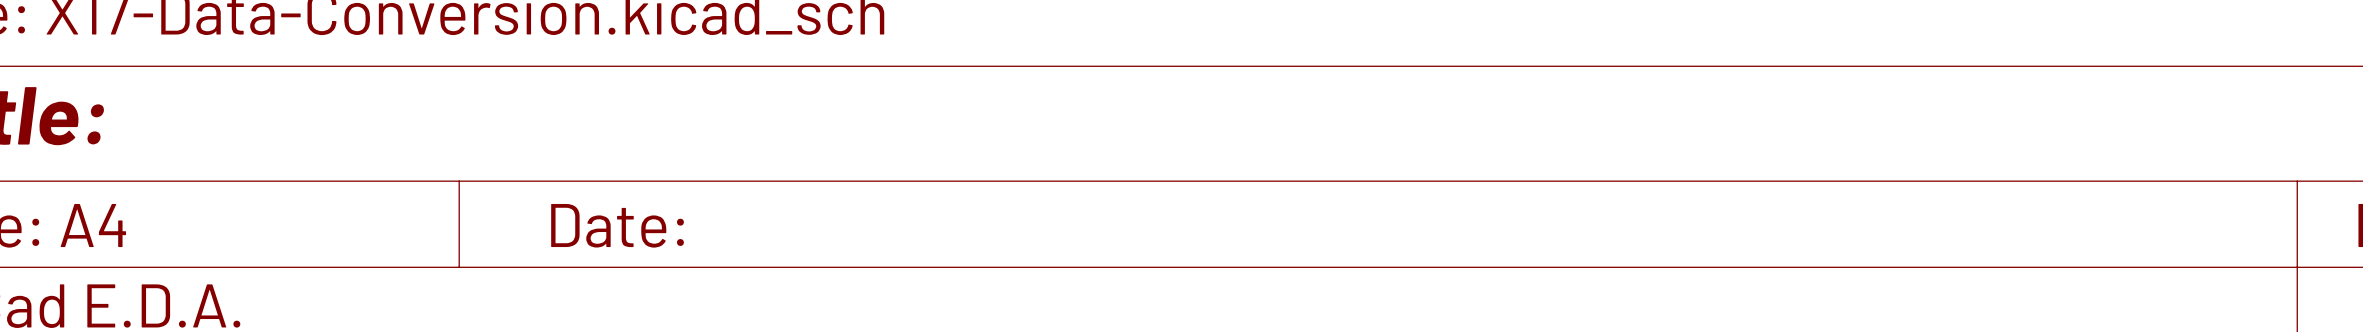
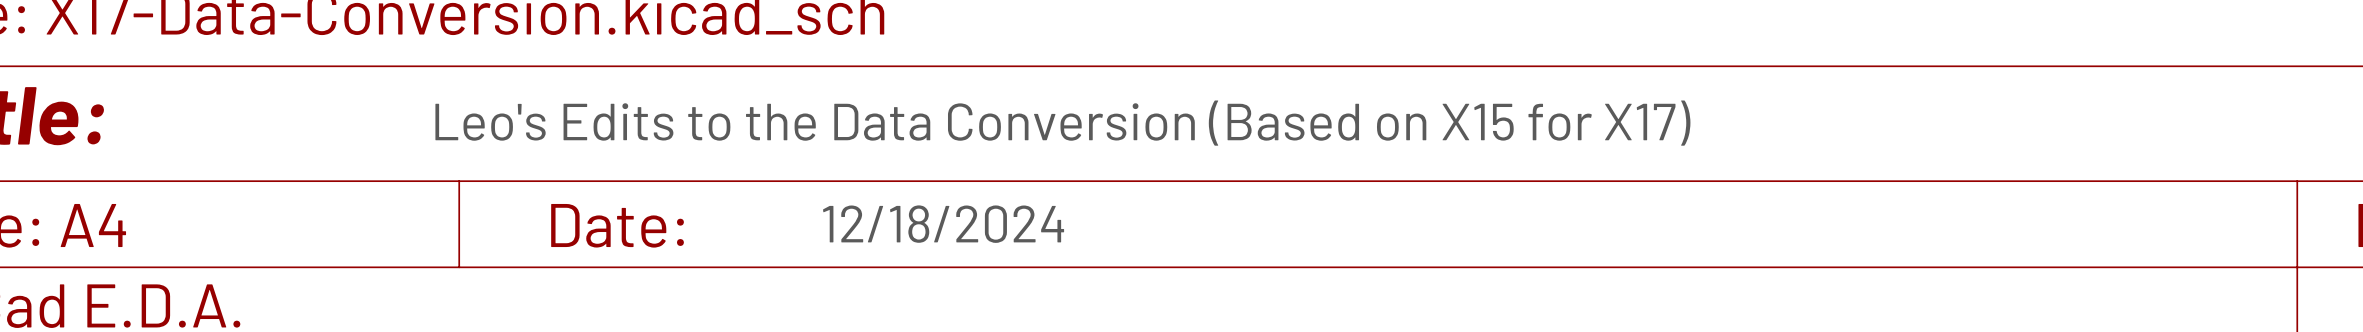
text: none -> Leo's Edits to the Data Conversion (Based on X15 for X17) (1062, 123)
text: none -> 12/18/2024 (943, 224)

